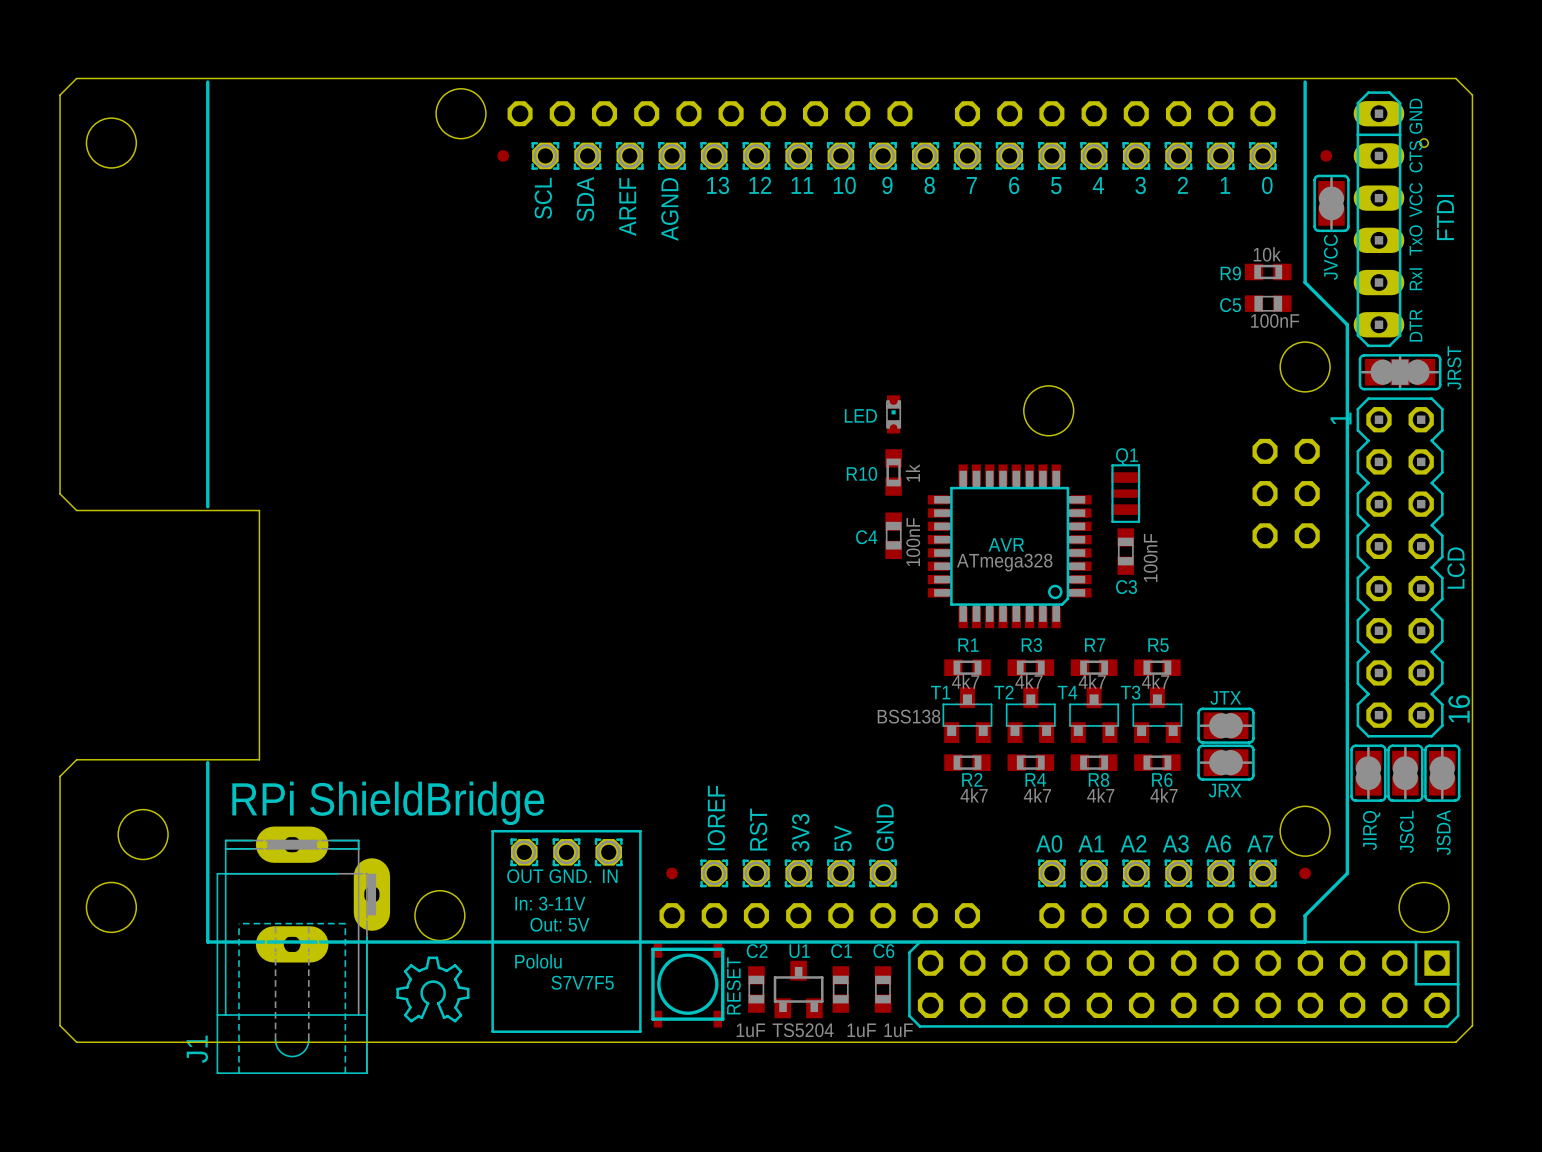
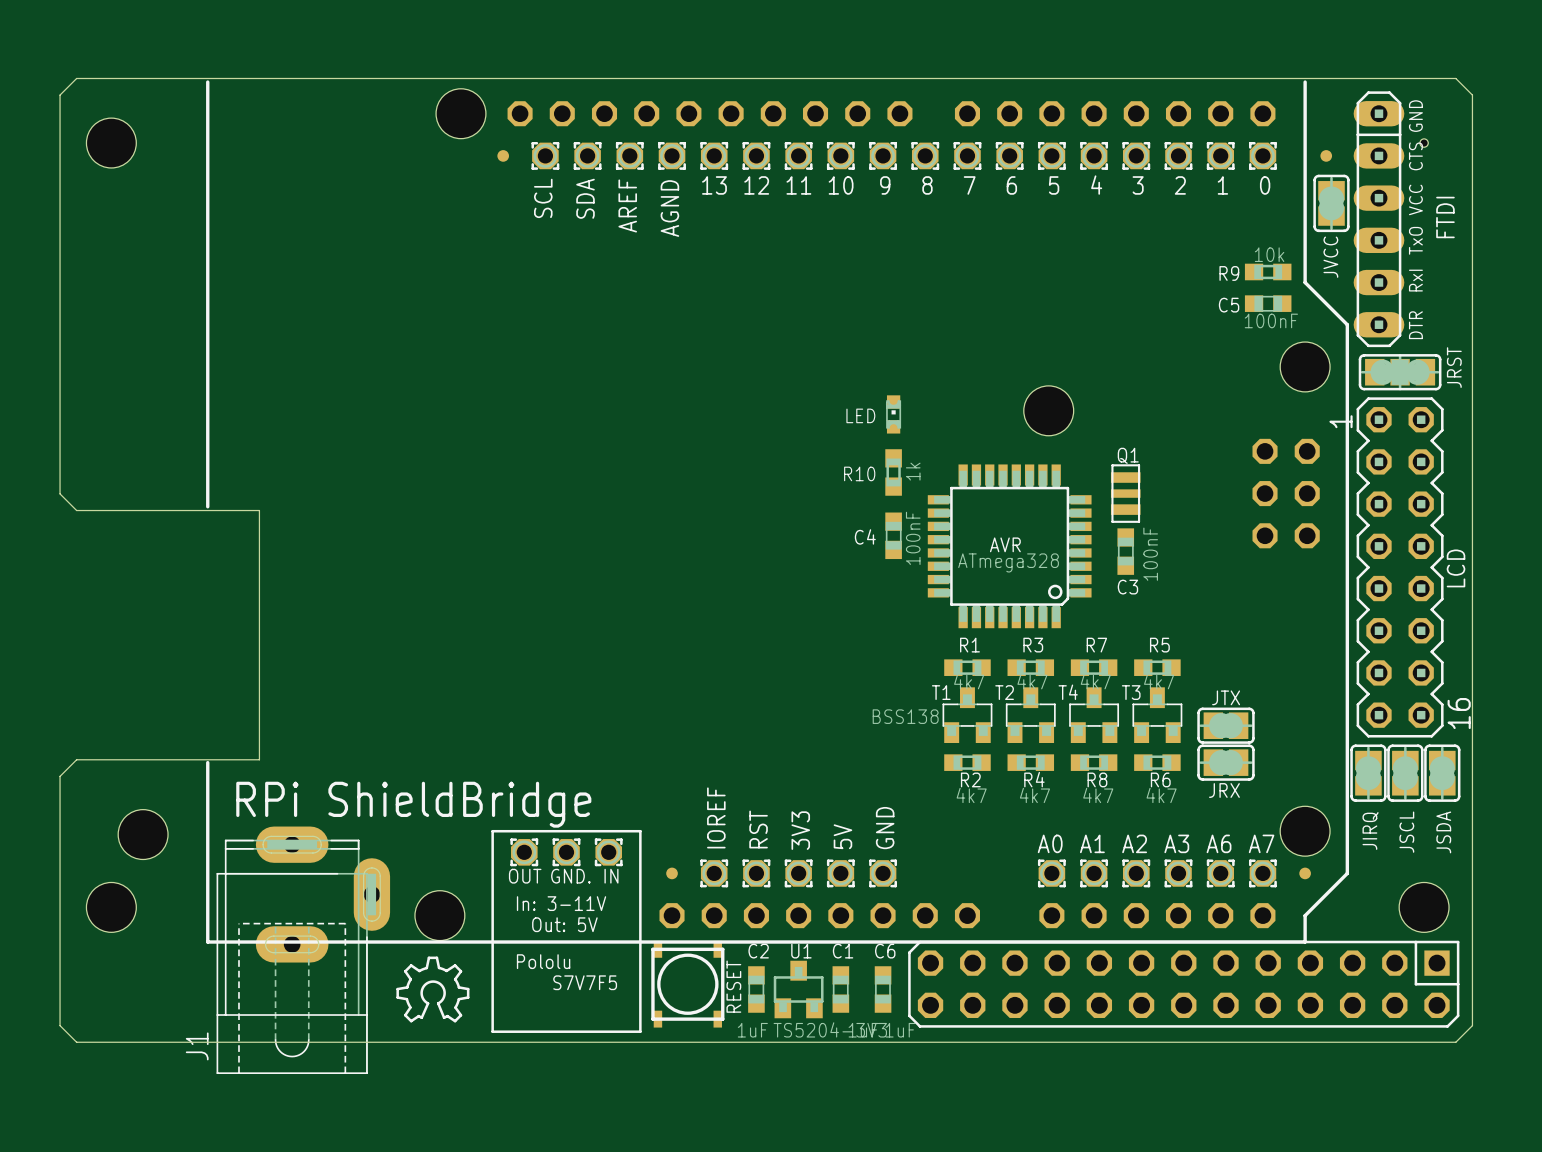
U1 value: TS5204 (803, 1030) -> TS5204-3V3 (830, 1029)

